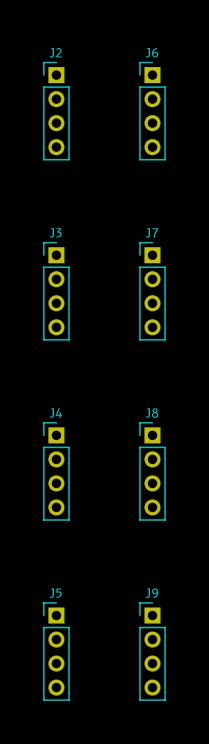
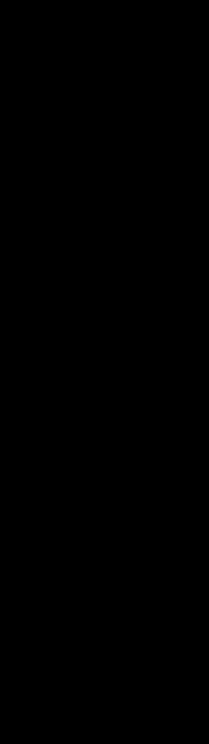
J2: (56, 111) -> none
J6: (152, 111) -> none
J3: (56, 291) -> none
J7: (152, 291) -> none
J4: (56, 471) -> none
J8: (152, 471) -> none
J5: (56, 651) -> none
J9: (152, 651) -> none

